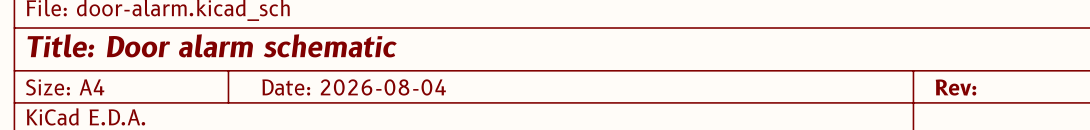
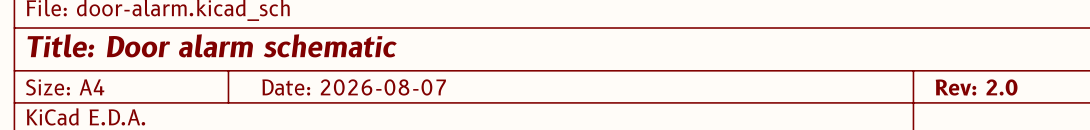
title block: Date: 2026-08-04 (354, 87) -> Date: 2026-08-07 (354, 87)
title block: Rev: (955, 87) -> Rev: 2.0 (976, 87)

